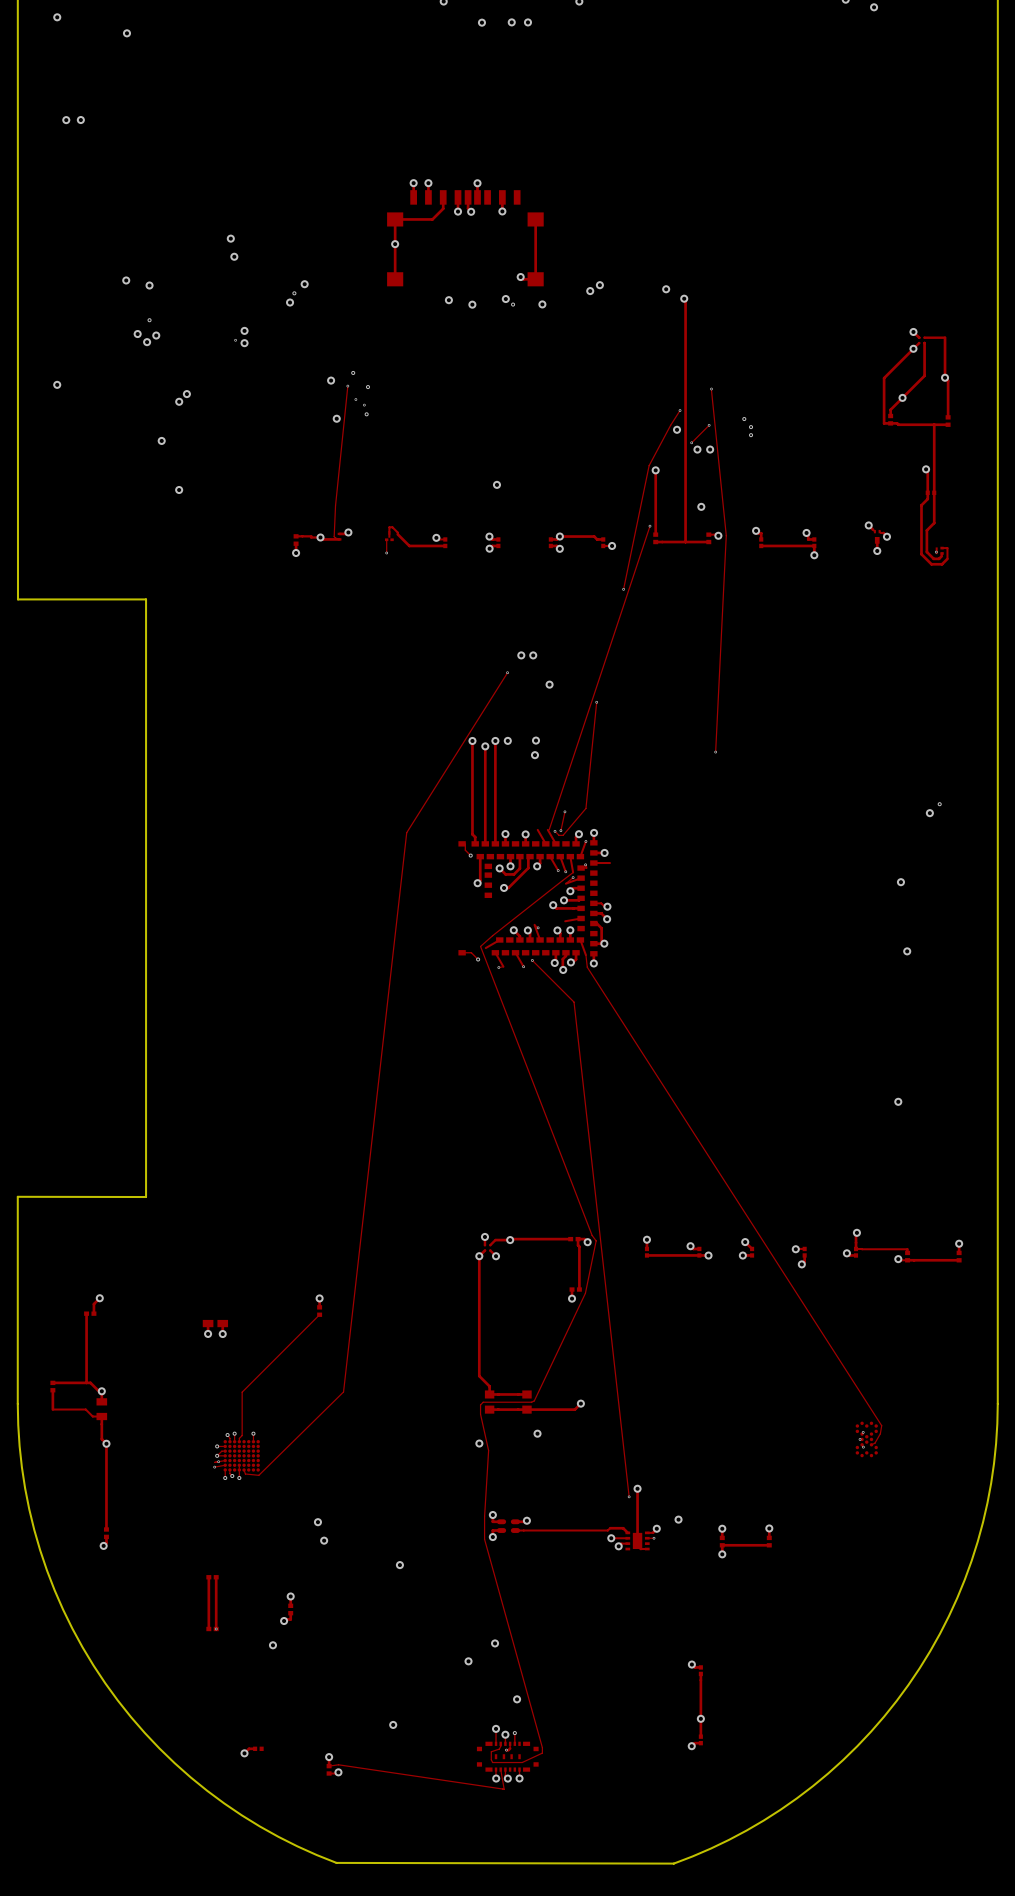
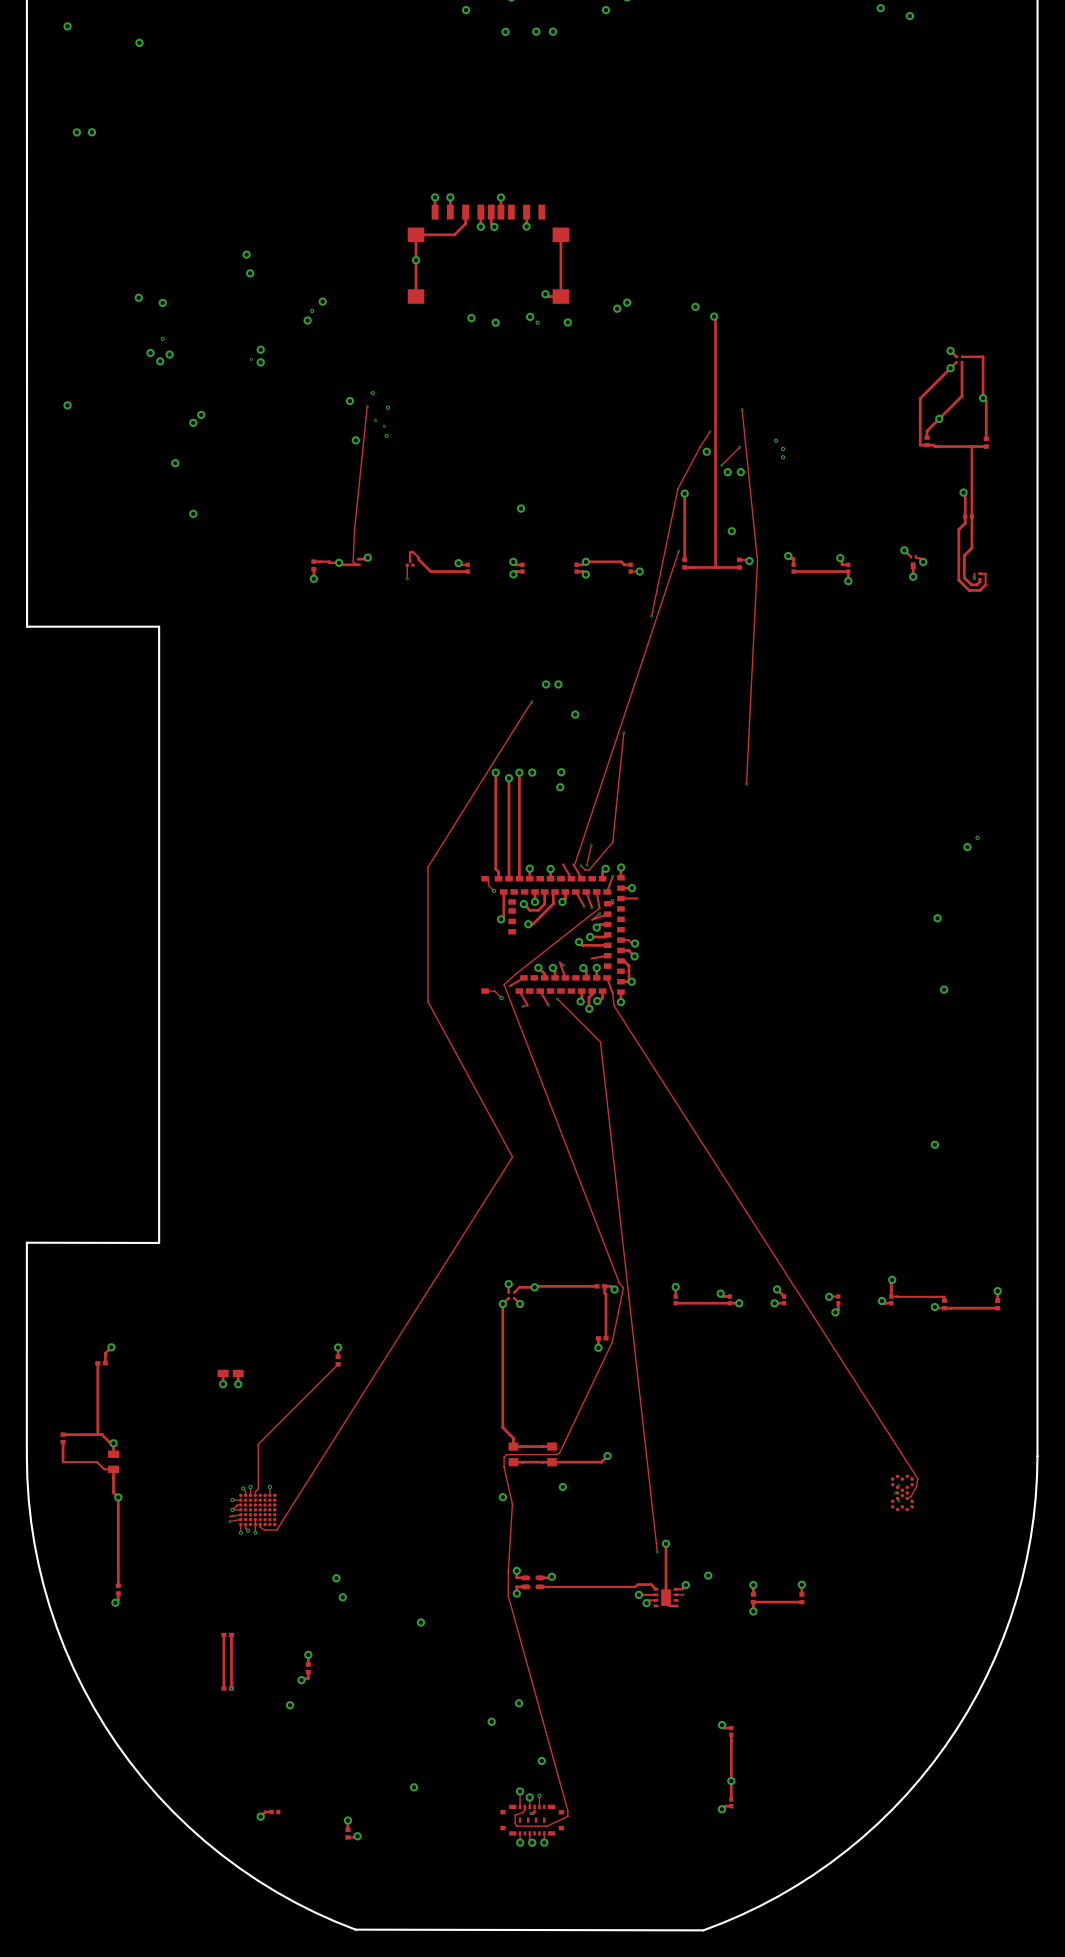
track: (507, 672) (406, 832) (343, 1391) (258, 1475) (245, 1473) (244, 1469) -> (532, 700) (427, 867) (427, 1001) (512, 1157) (276, 1529) (264, 1529) (260, 1527) (260, 1524)
track: (329, 1766) (338, 1764) (504, 1789) (500, 1769) -> none

